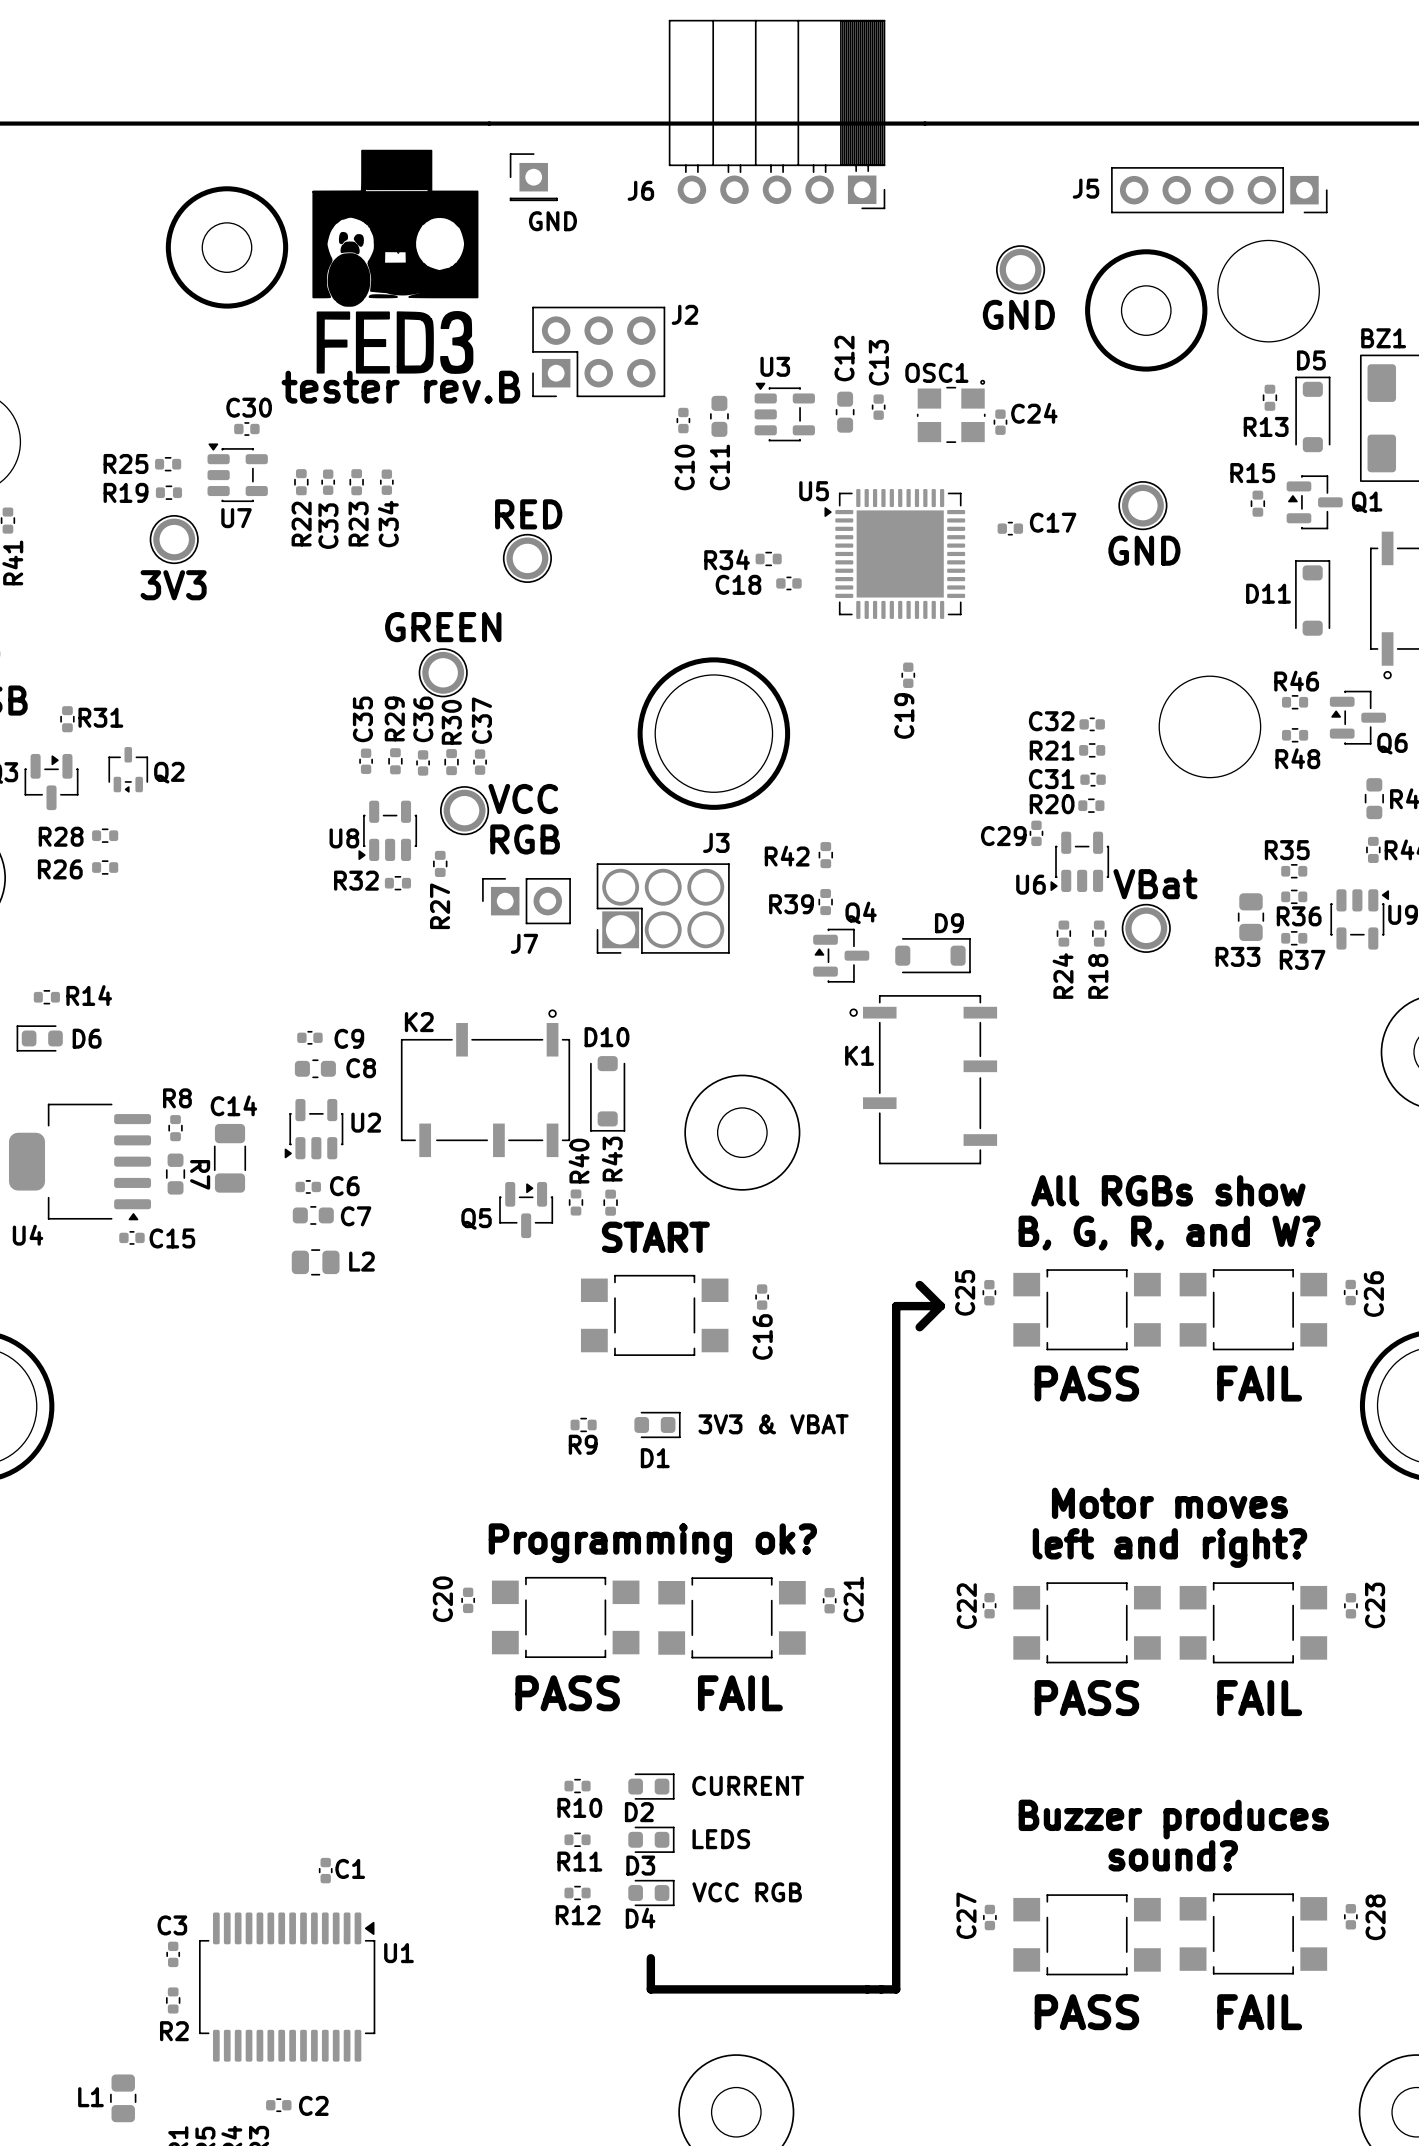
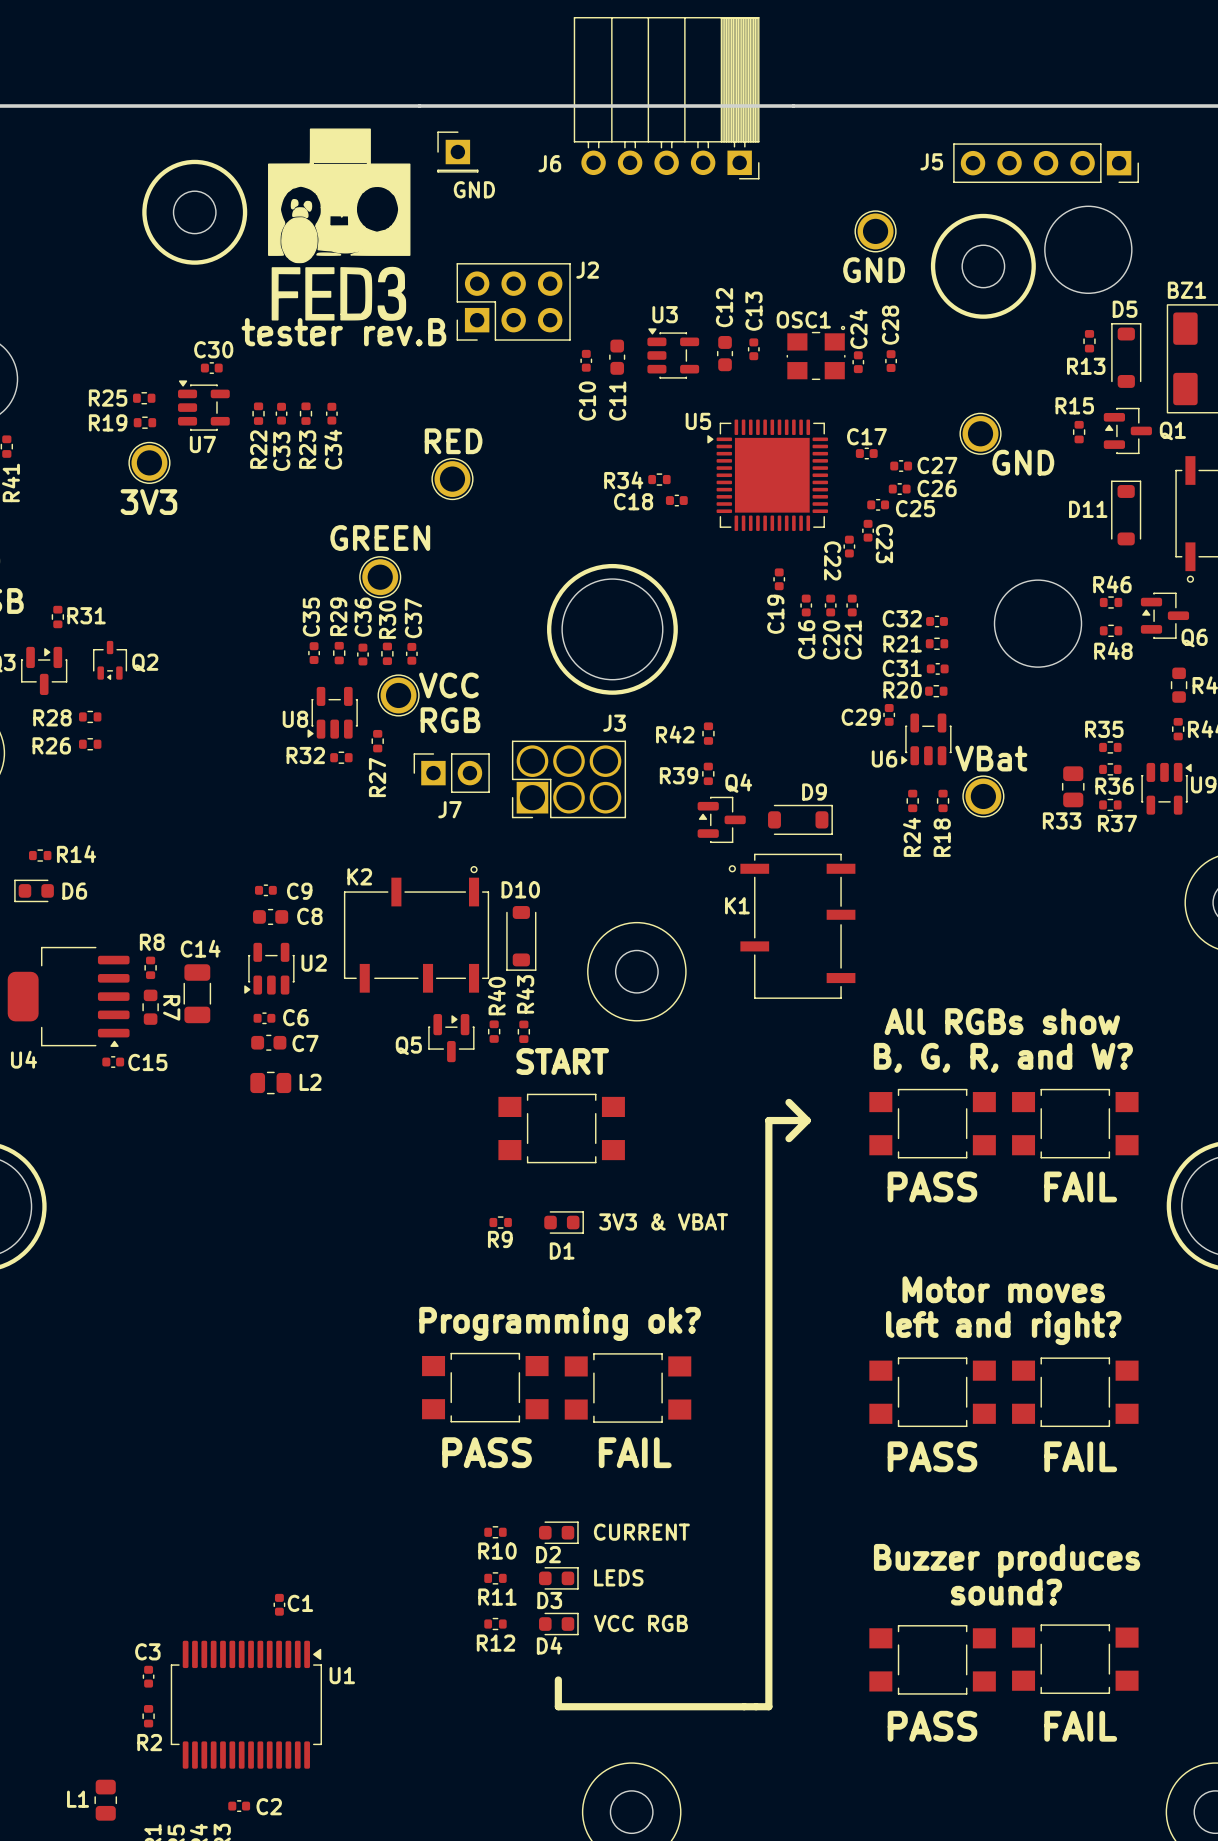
C24 name rotation: 0° (1034, 413) -> 90° counterclockwise (858, 329)
C17 name position: C17 (1053, 522) -> C17 (866, 436)
text position: GND (1144, 550) -> GND (1023, 462)
C25 name position: C25 (965, 1292) -> C25 (915, 508)
C25 rotation: 0° (989, 1292) -> 90° clockwise (878, 504)
C25 position: (989, 1292) -> (878, 504)
C26 rotation: 0° (1350, 1292) -> 90° clockwise (899, 489)
C26 position: (1350, 1292) -> (899, 489)
C16 position: (762, 1297) -> (806, 605)
C20 name position: C20 (442, 1599) -> C20 (831, 640)
C21 name position: C21 (853, 1599) -> C21 (853, 640)
C20 position: (468, 1600) -> (830, 605)
C21 position: (829, 1600) -> (852, 605)
C22 position: (989, 1605) -> (849, 546)
C23 position: (1350, 1605) -> (868, 530)
C23 name rotation: 0° (1375, 1605) -> 180° (884, 543)
C22 name rotation: 0° (966, 1606) -> 180° (832, 560)
C27 name position: C27 (966, 1915) -> C27 (937, 465)
C28 position: (1350, 1916) -> (891, 361)
C27 rotation: 0° (989, 1917) -> 90° clockwise (901, 466)
C27 position: (989, 1917) -> (901, 466)
C28 name position: C28 (1375, 1917) -> C28 (890, 325)

